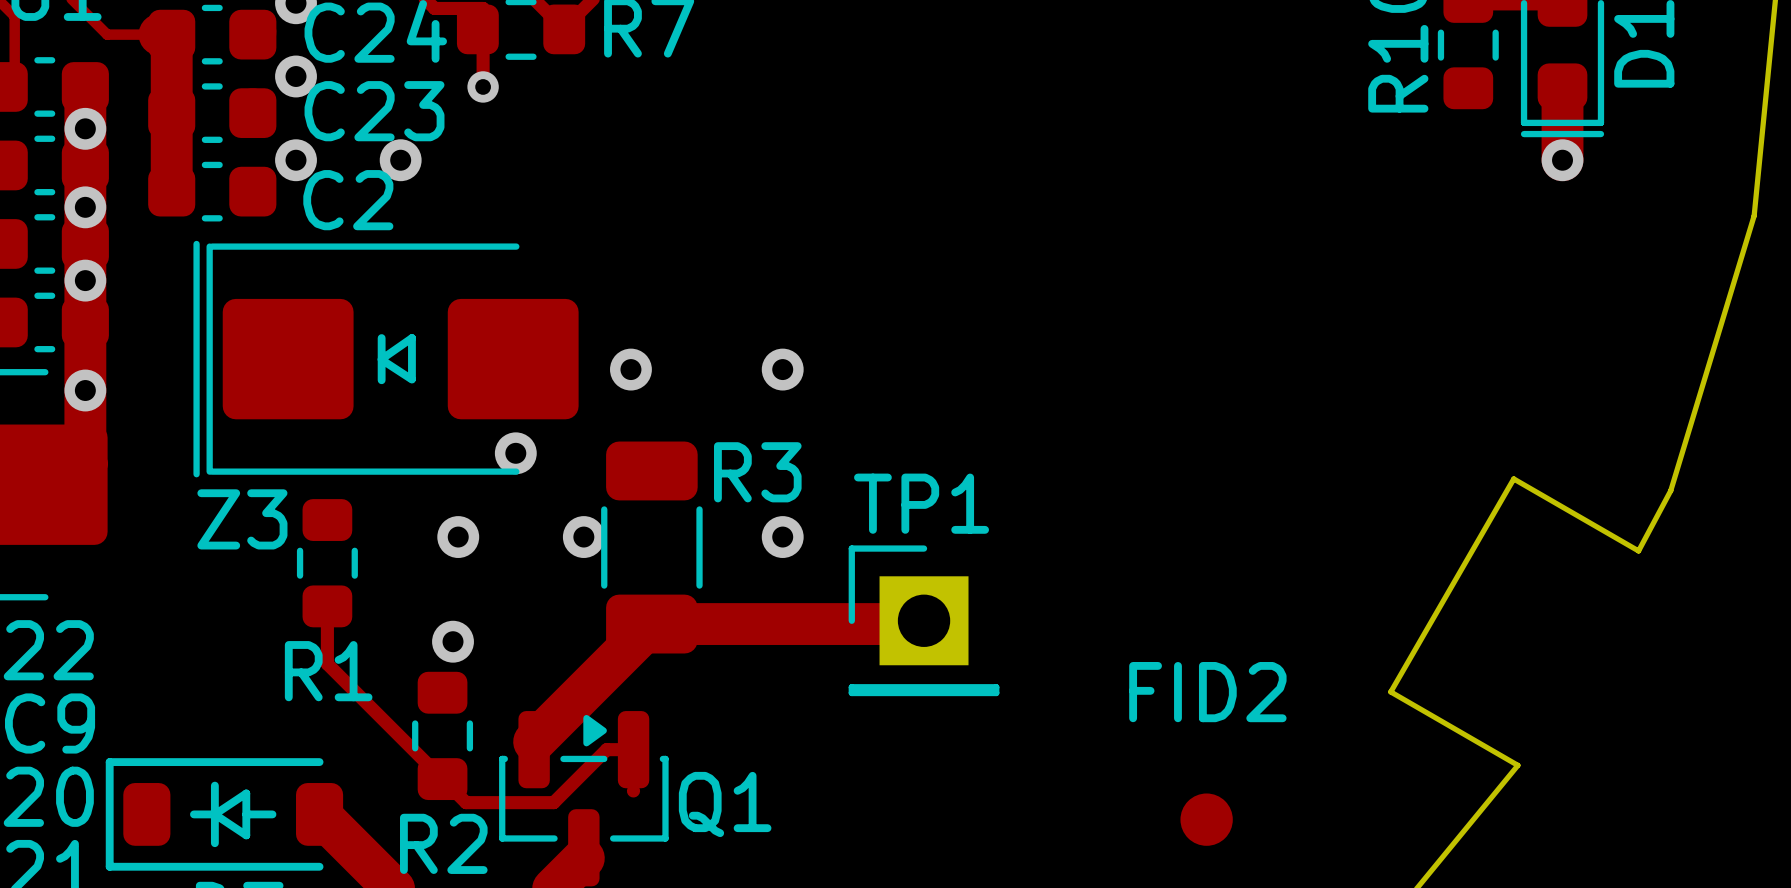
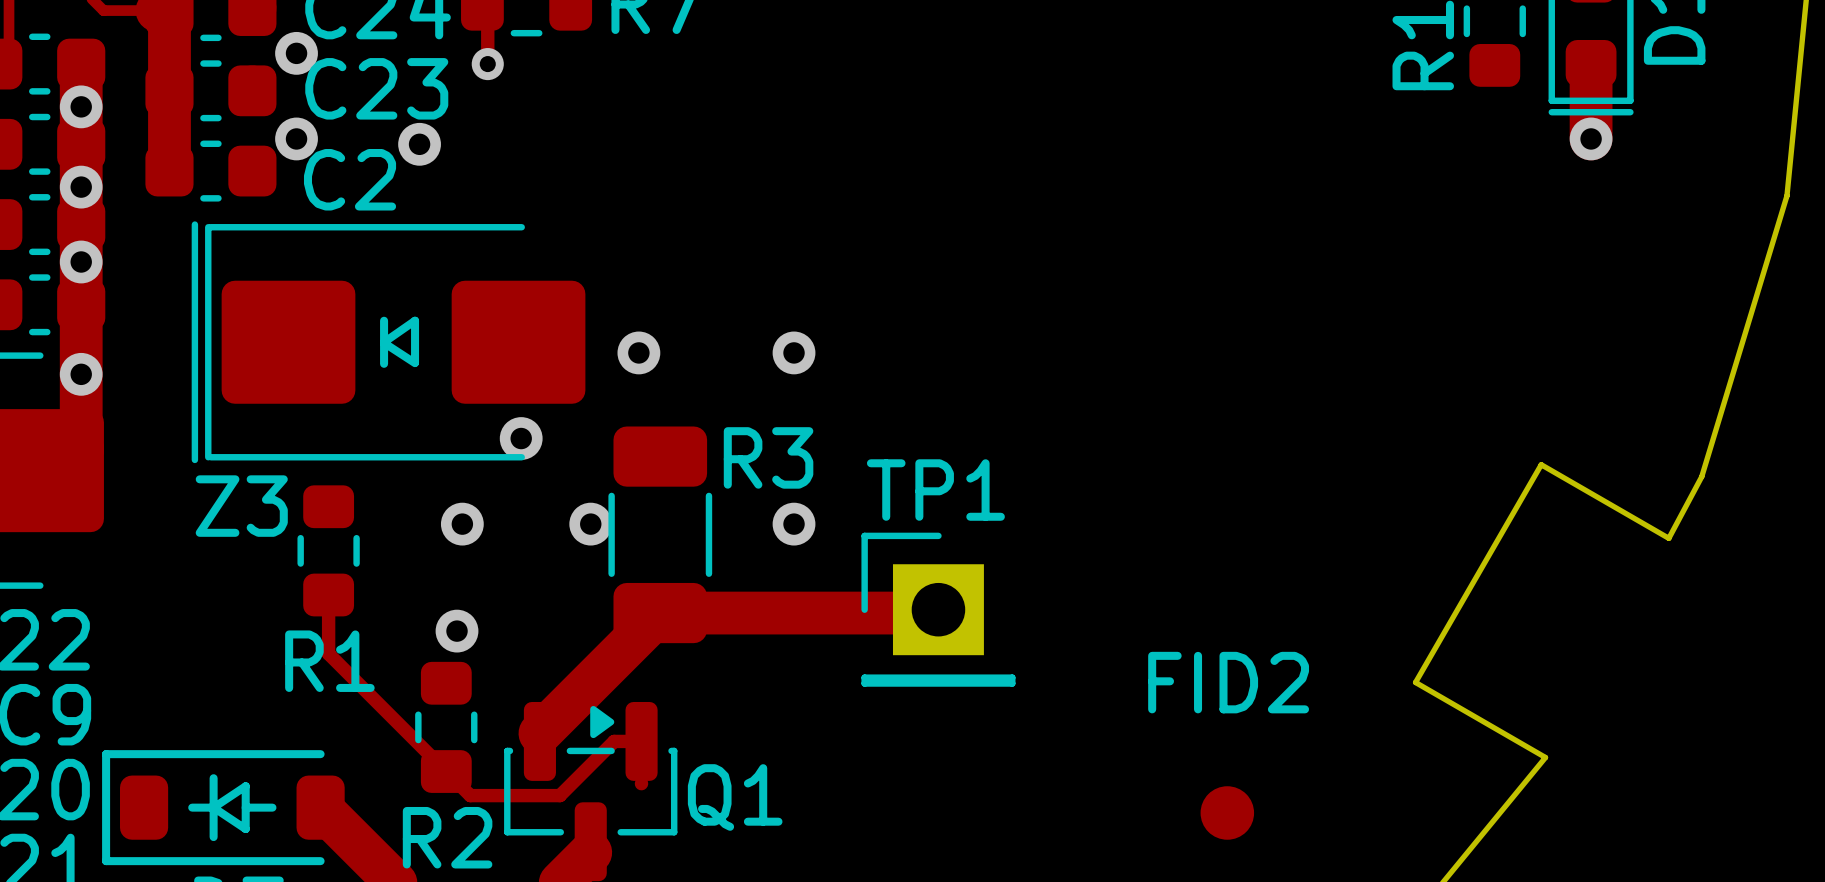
via position: (400, 160) -> (419, 144)

